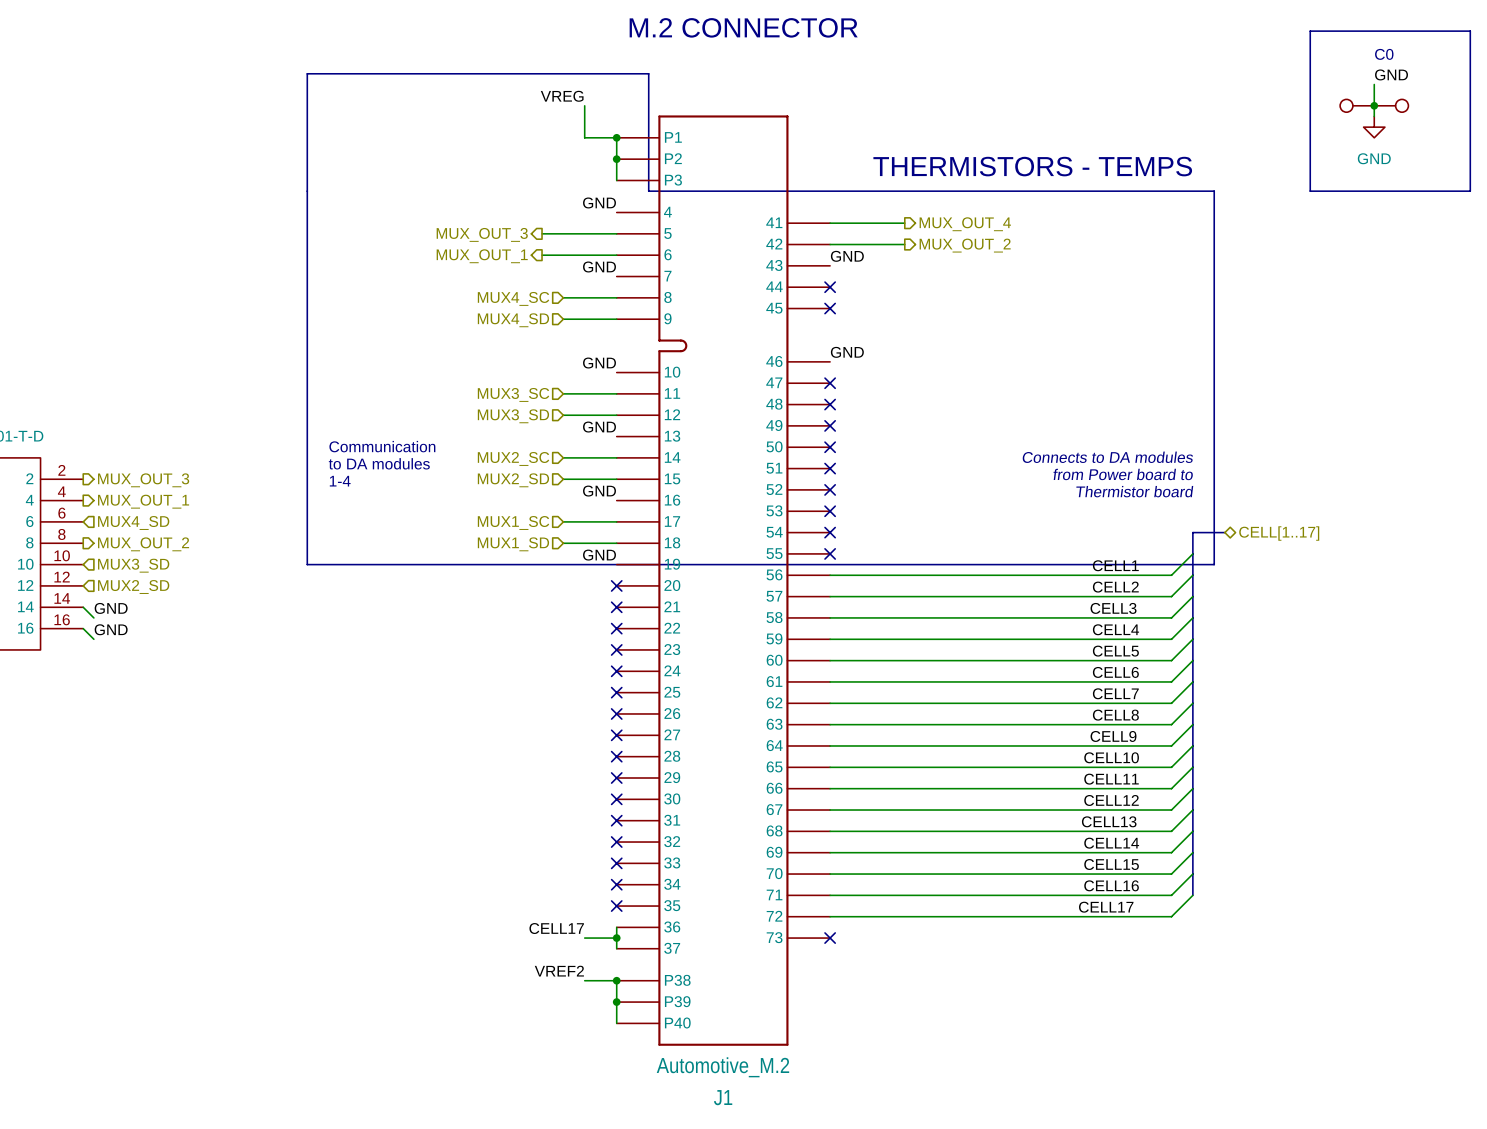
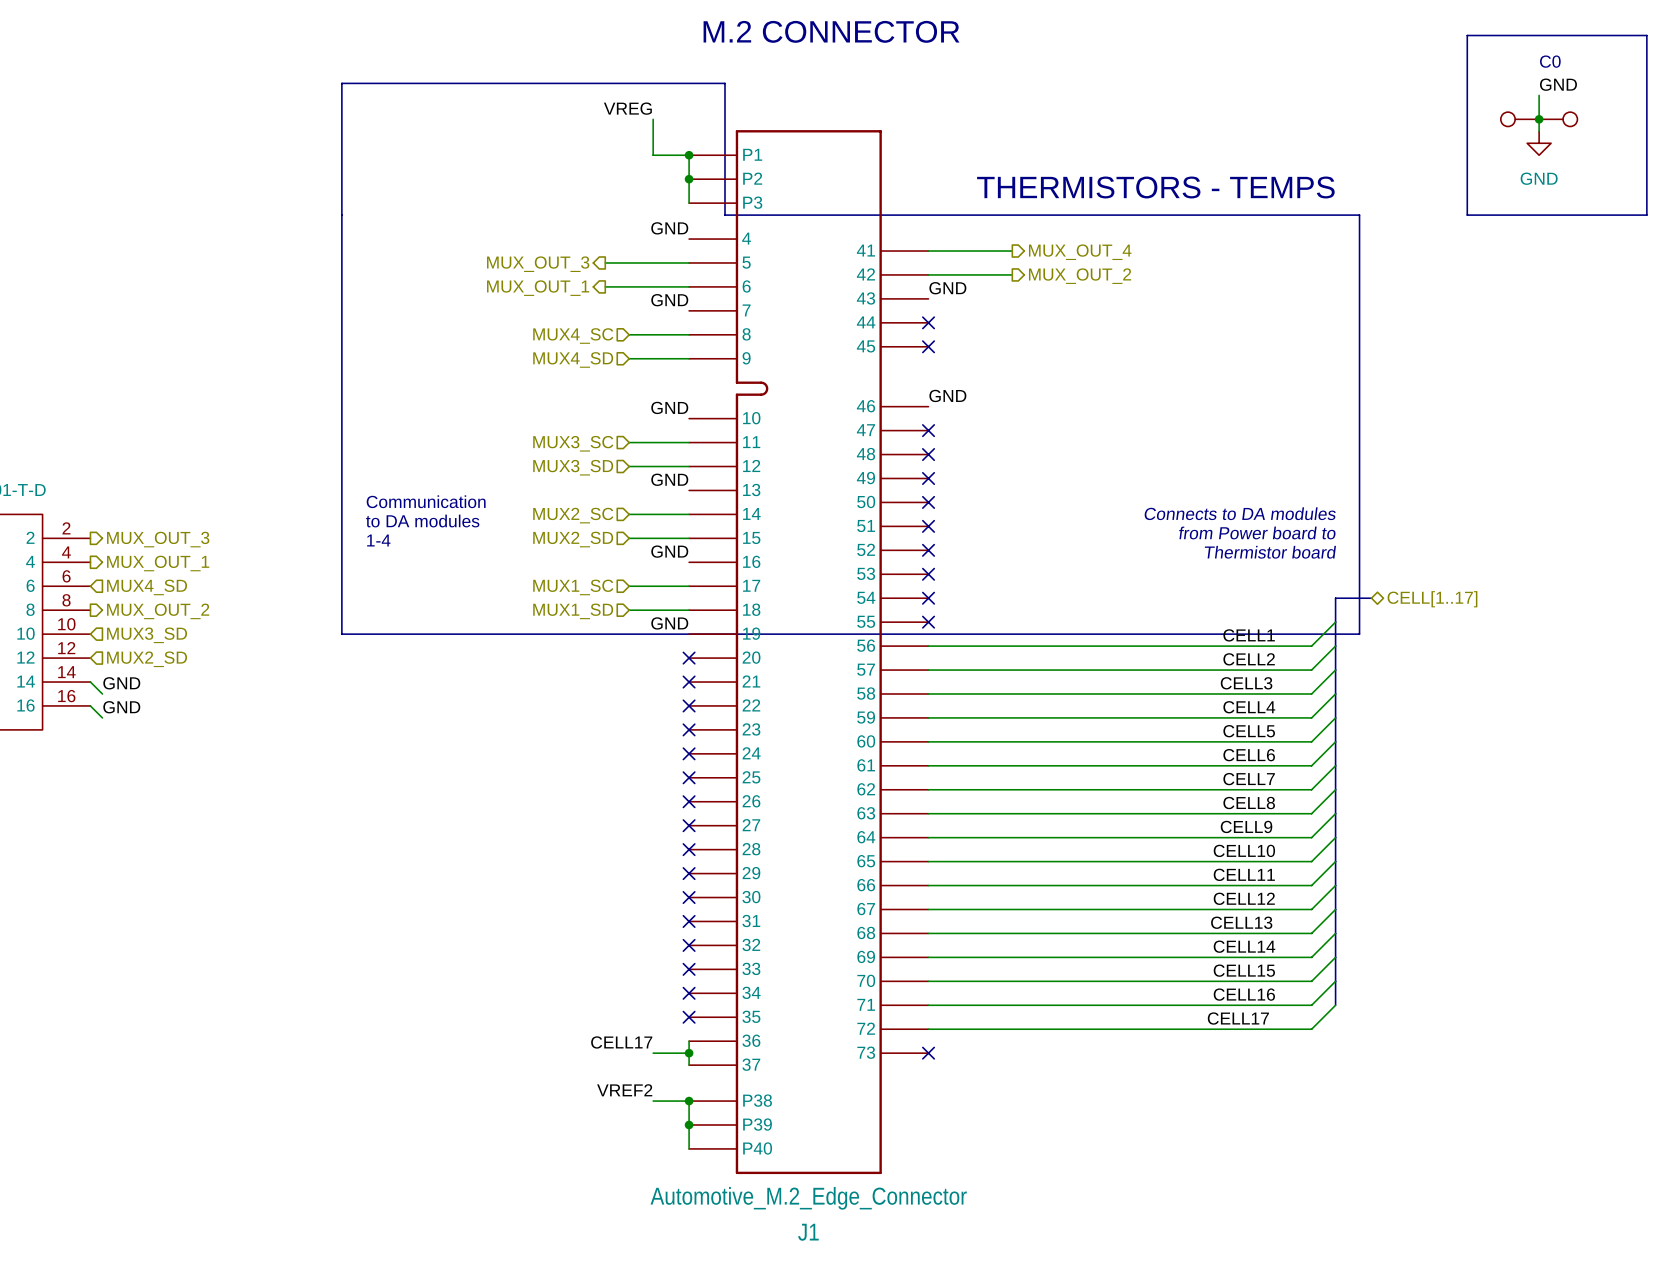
J1 value: Automotive_M.2 (722, 1067) -> Automotive_M.2_Edge_Connector (808, 1198)

